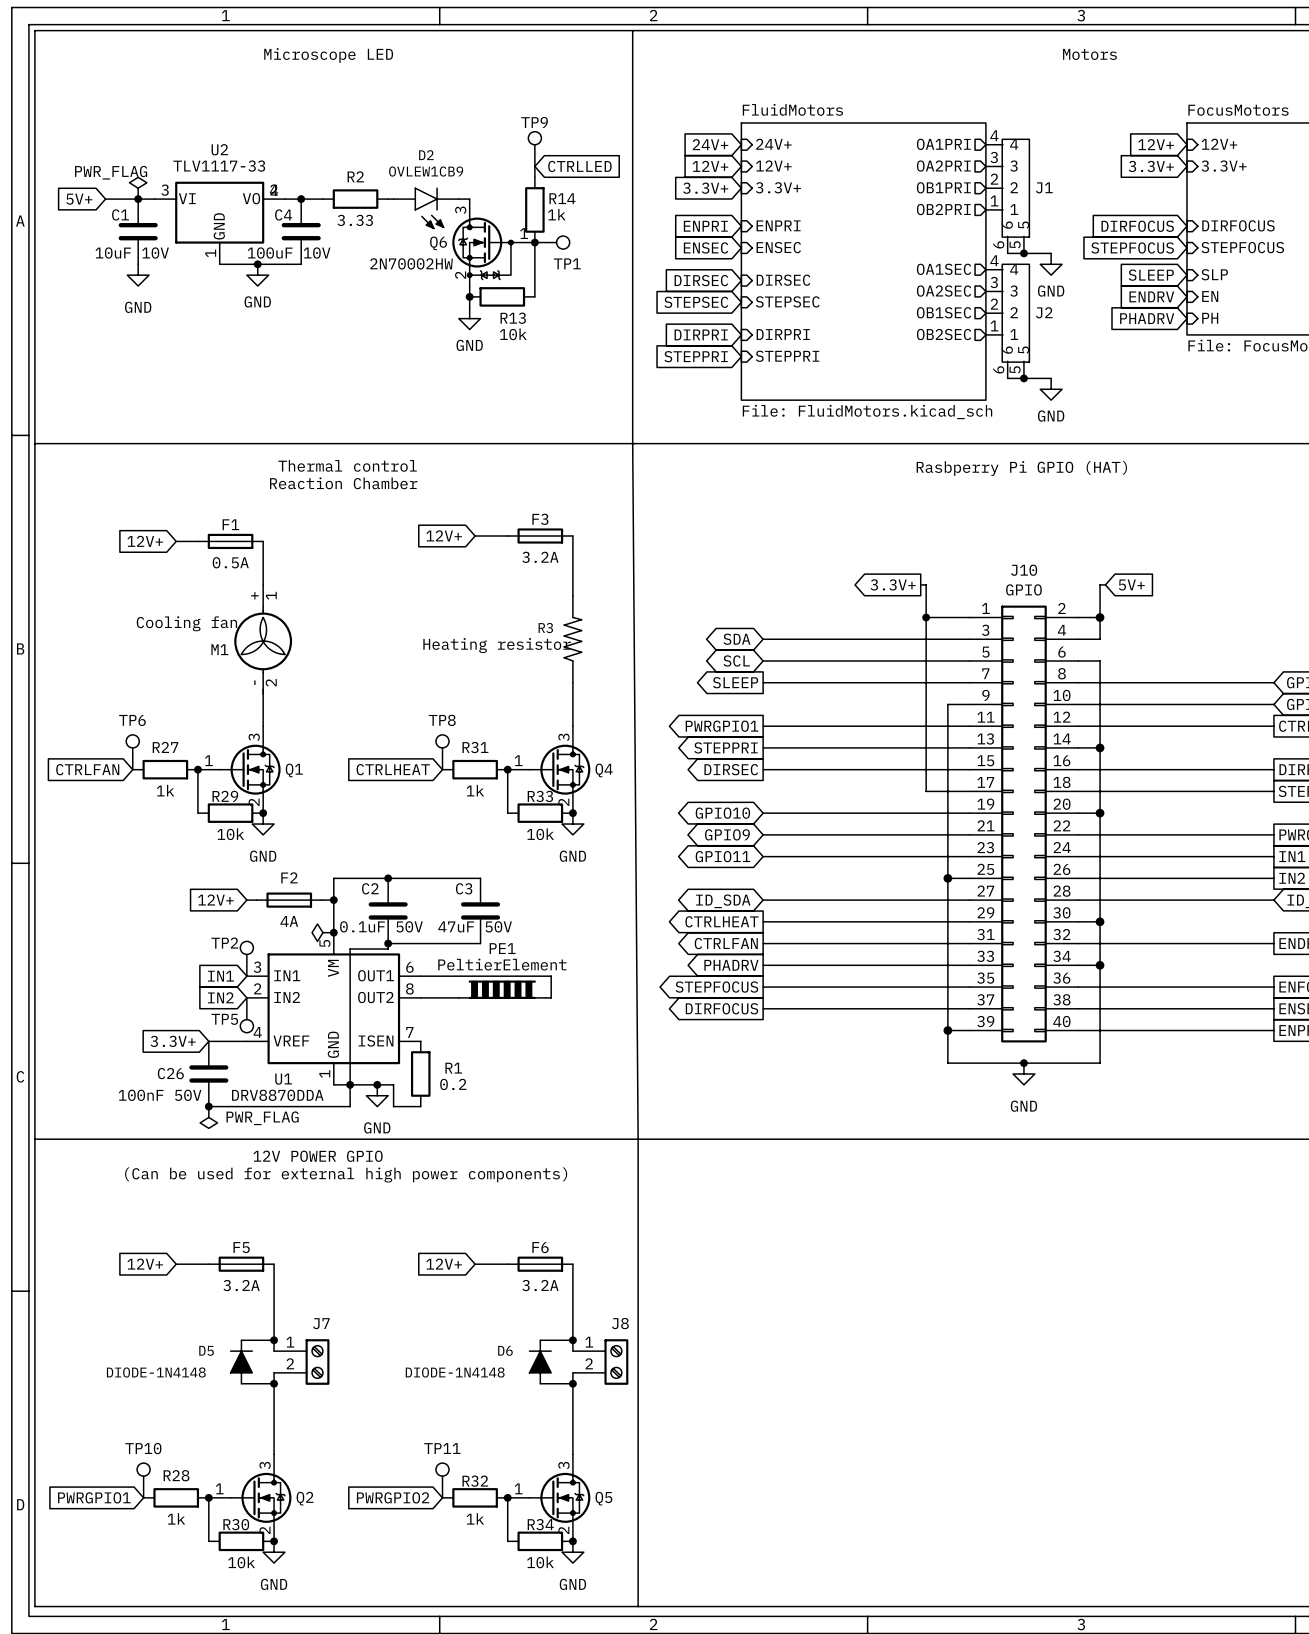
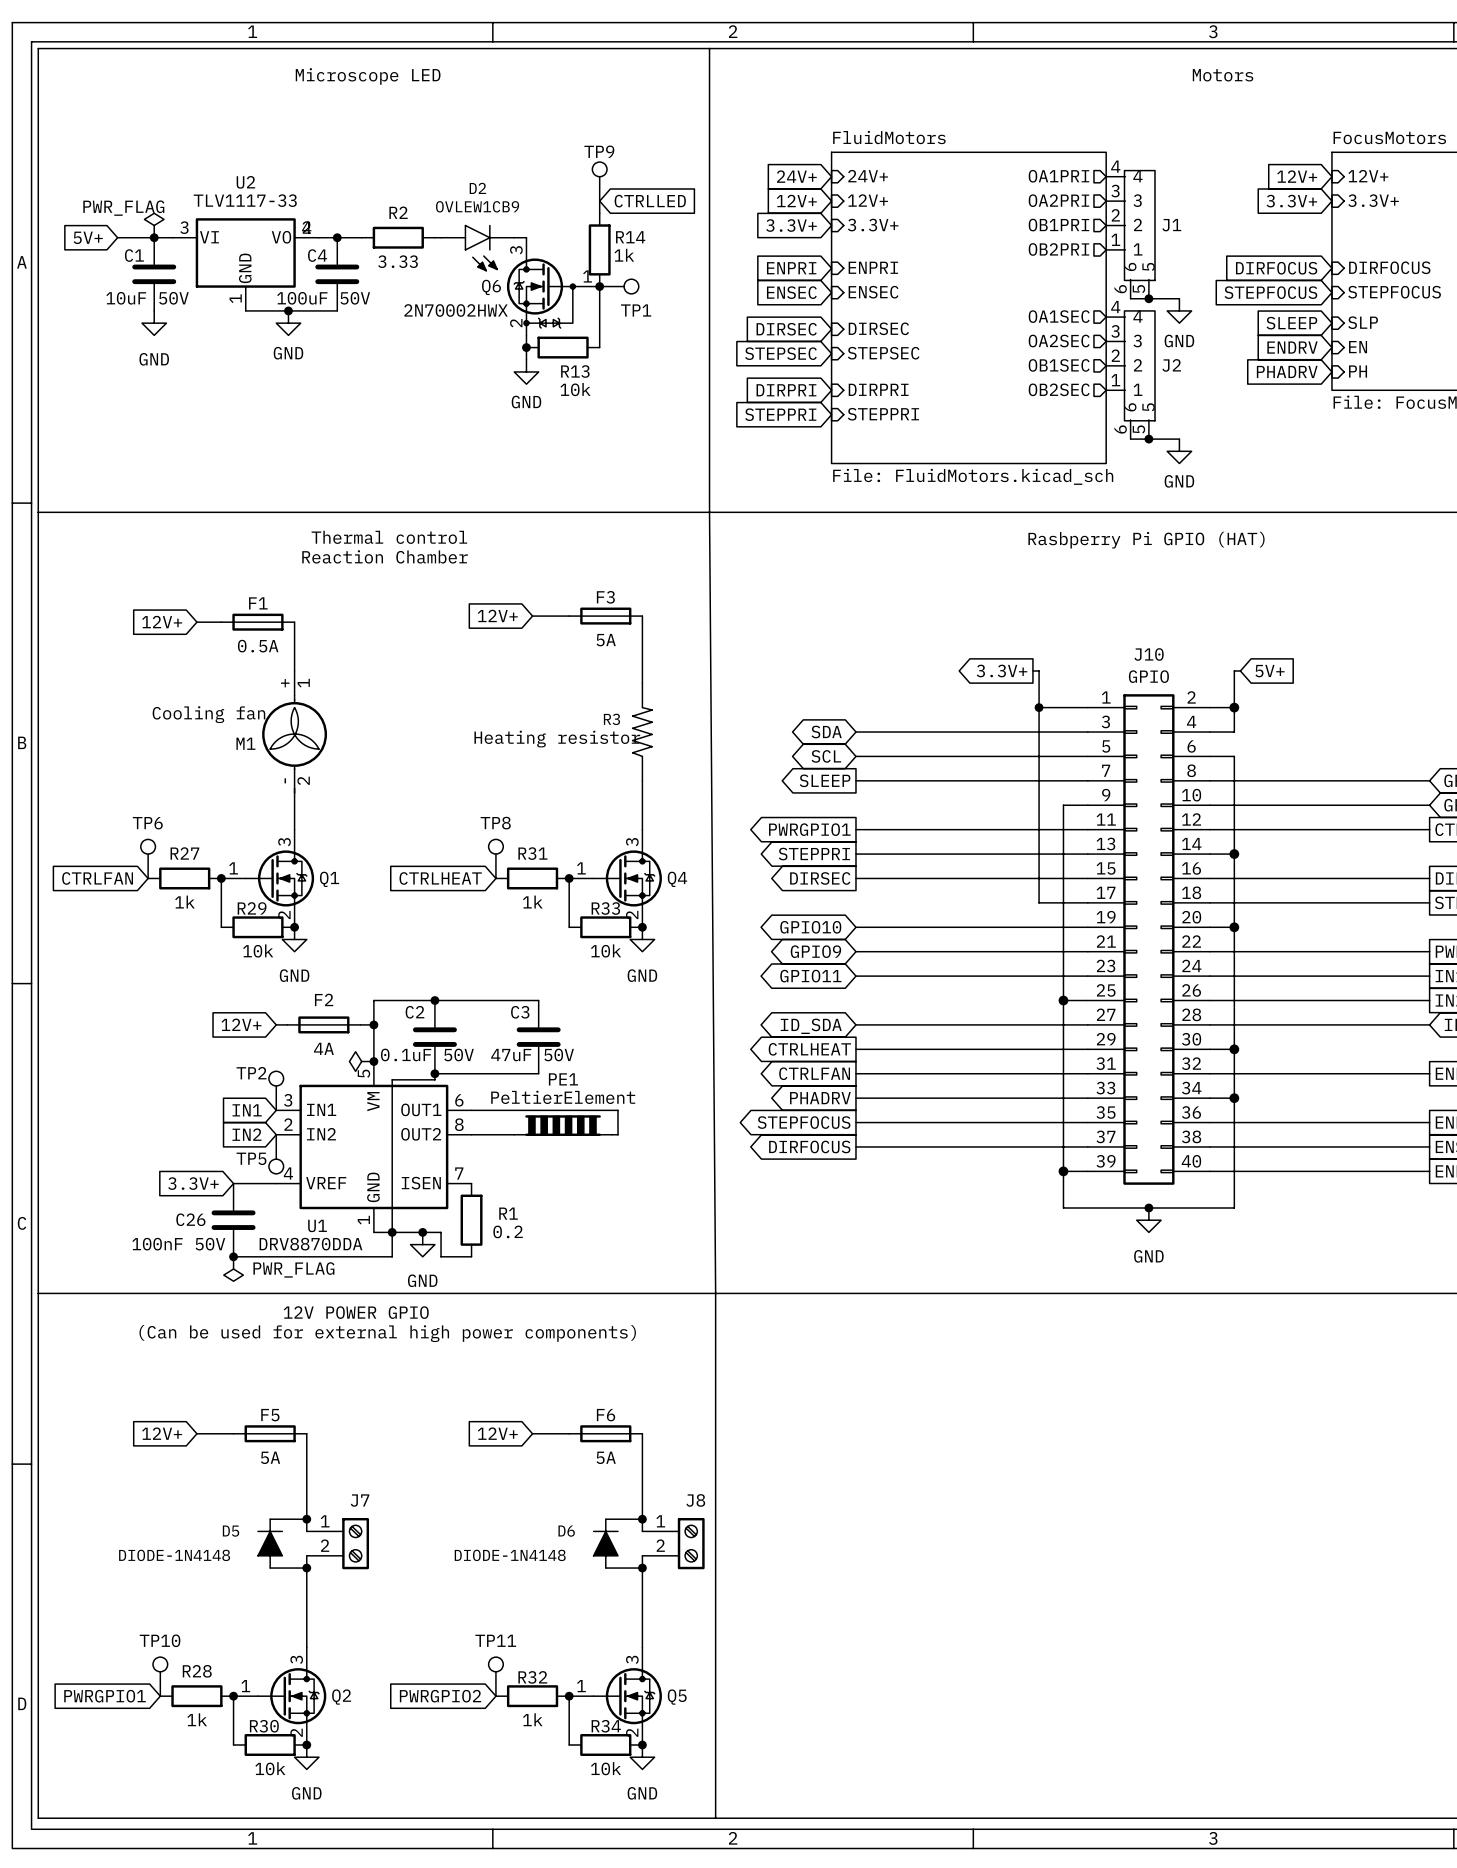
C1 value: 10uF 10V (132, 253) -> 10uF 50V (147, 298)
C4 value: 100uF 10V (289, 253) -> 100uF 50V (323, 298)
Q6 value: 2N70002HW (411, 263) -> 2N70002HWX (456, 310)
F3 value: 3.2A (540, 557) -> 5A (606, 640)
F5 value: 3.2A (241, 1285) -> 5A (270, 1457)
F6 value: 3.2A (540, 1285) -> 5A (606, 1457)

